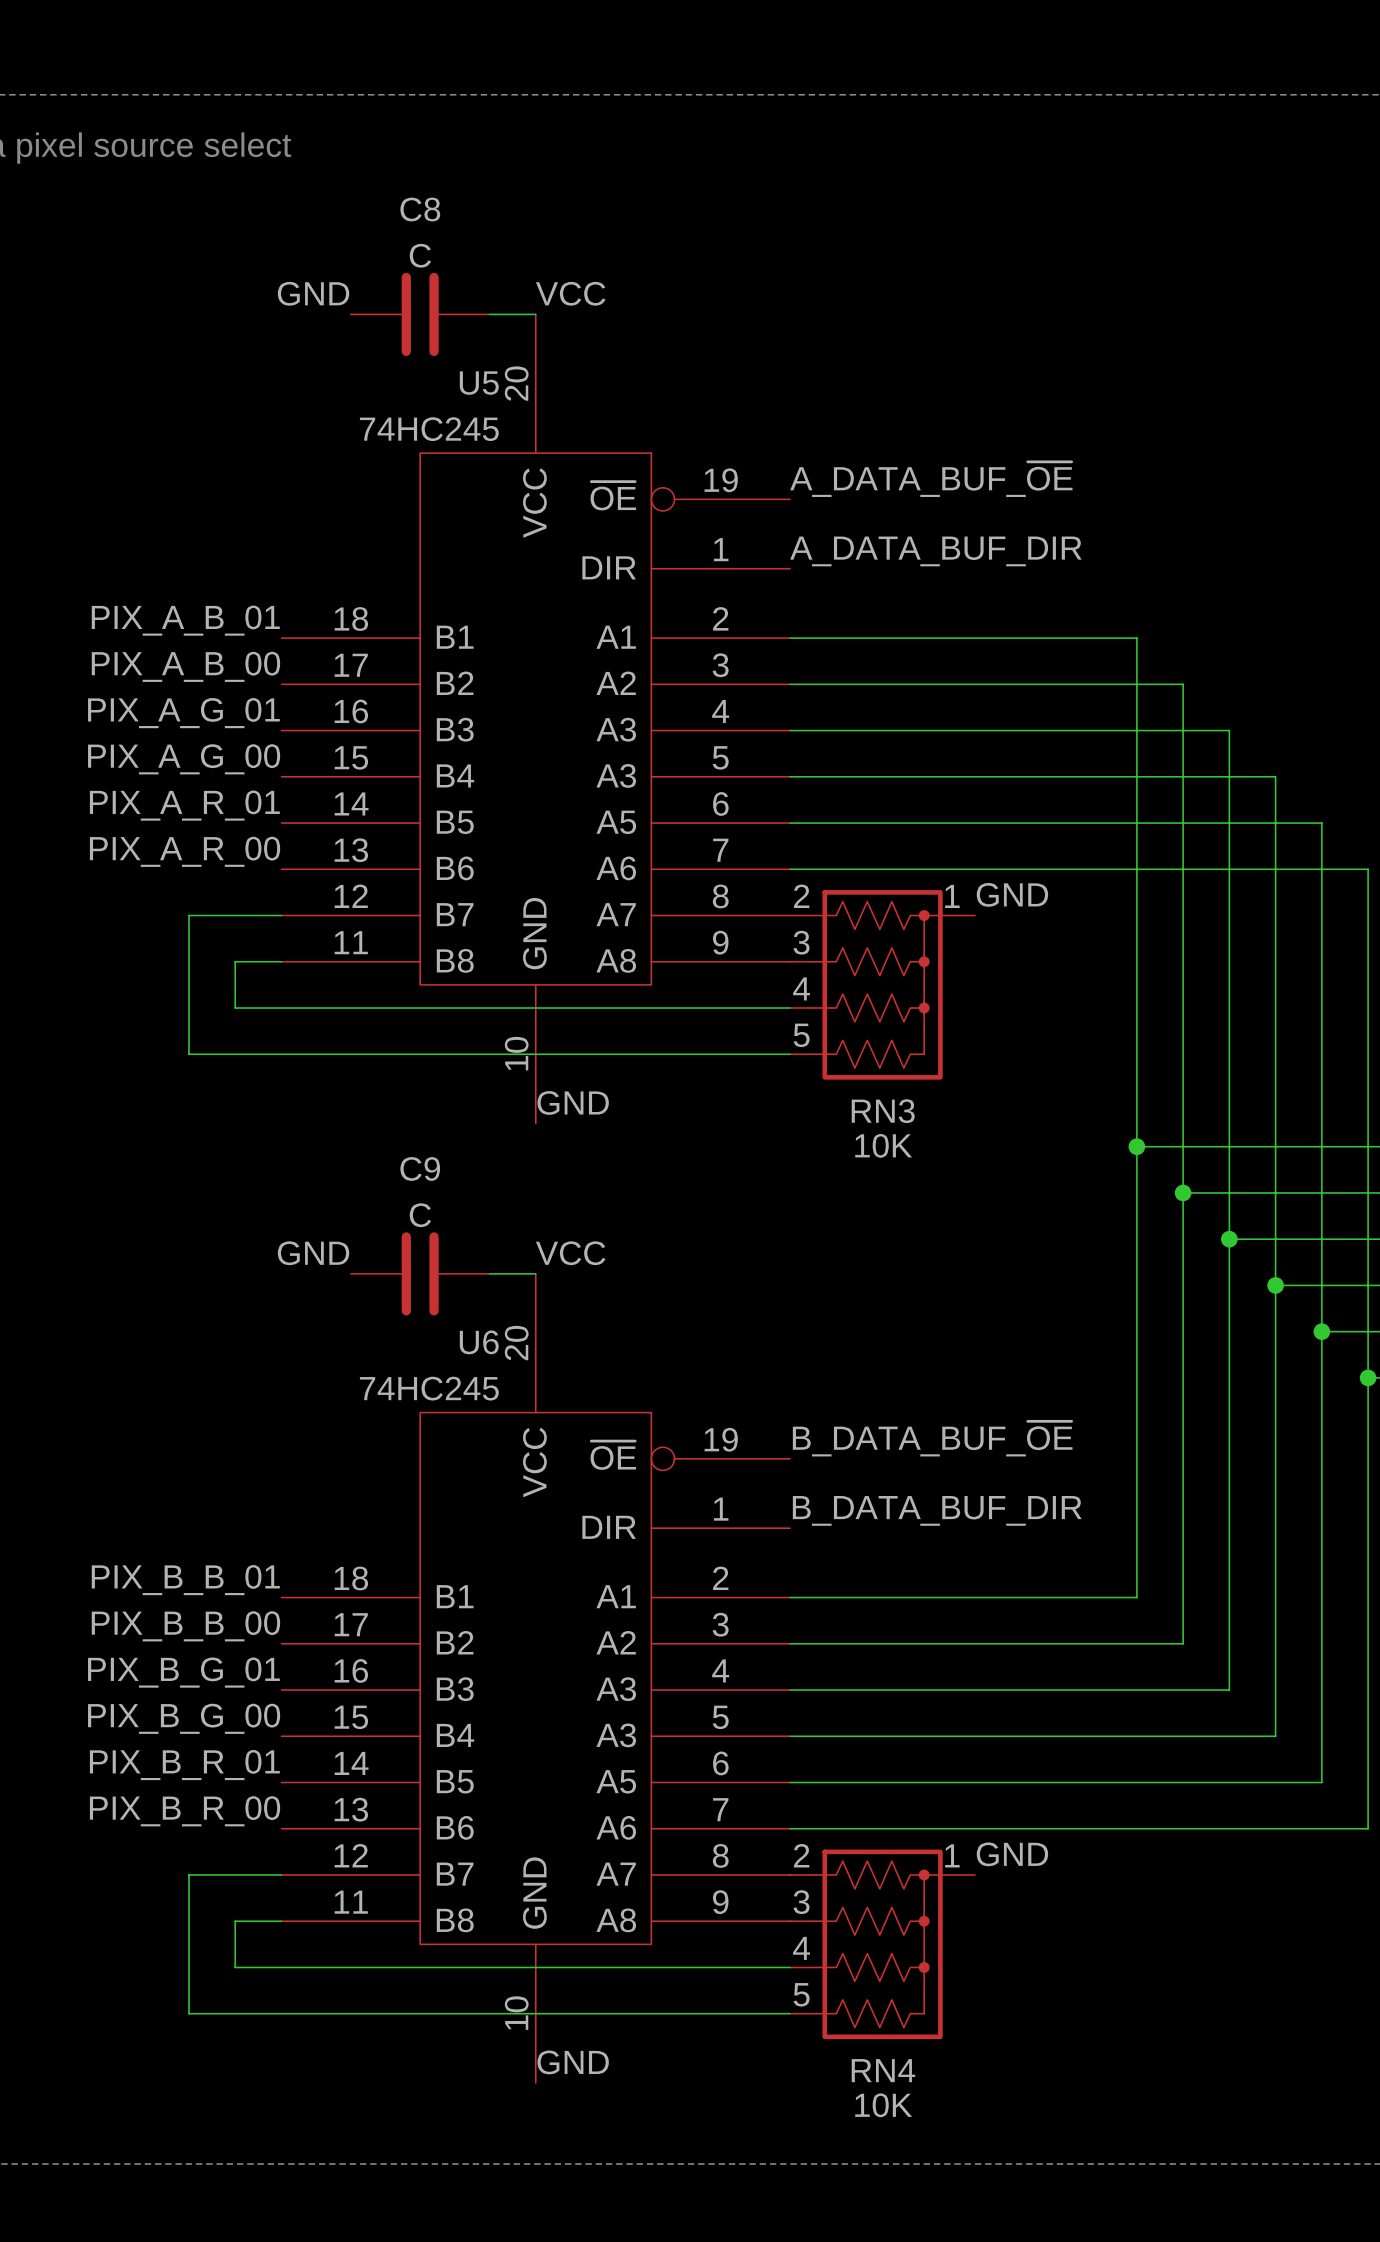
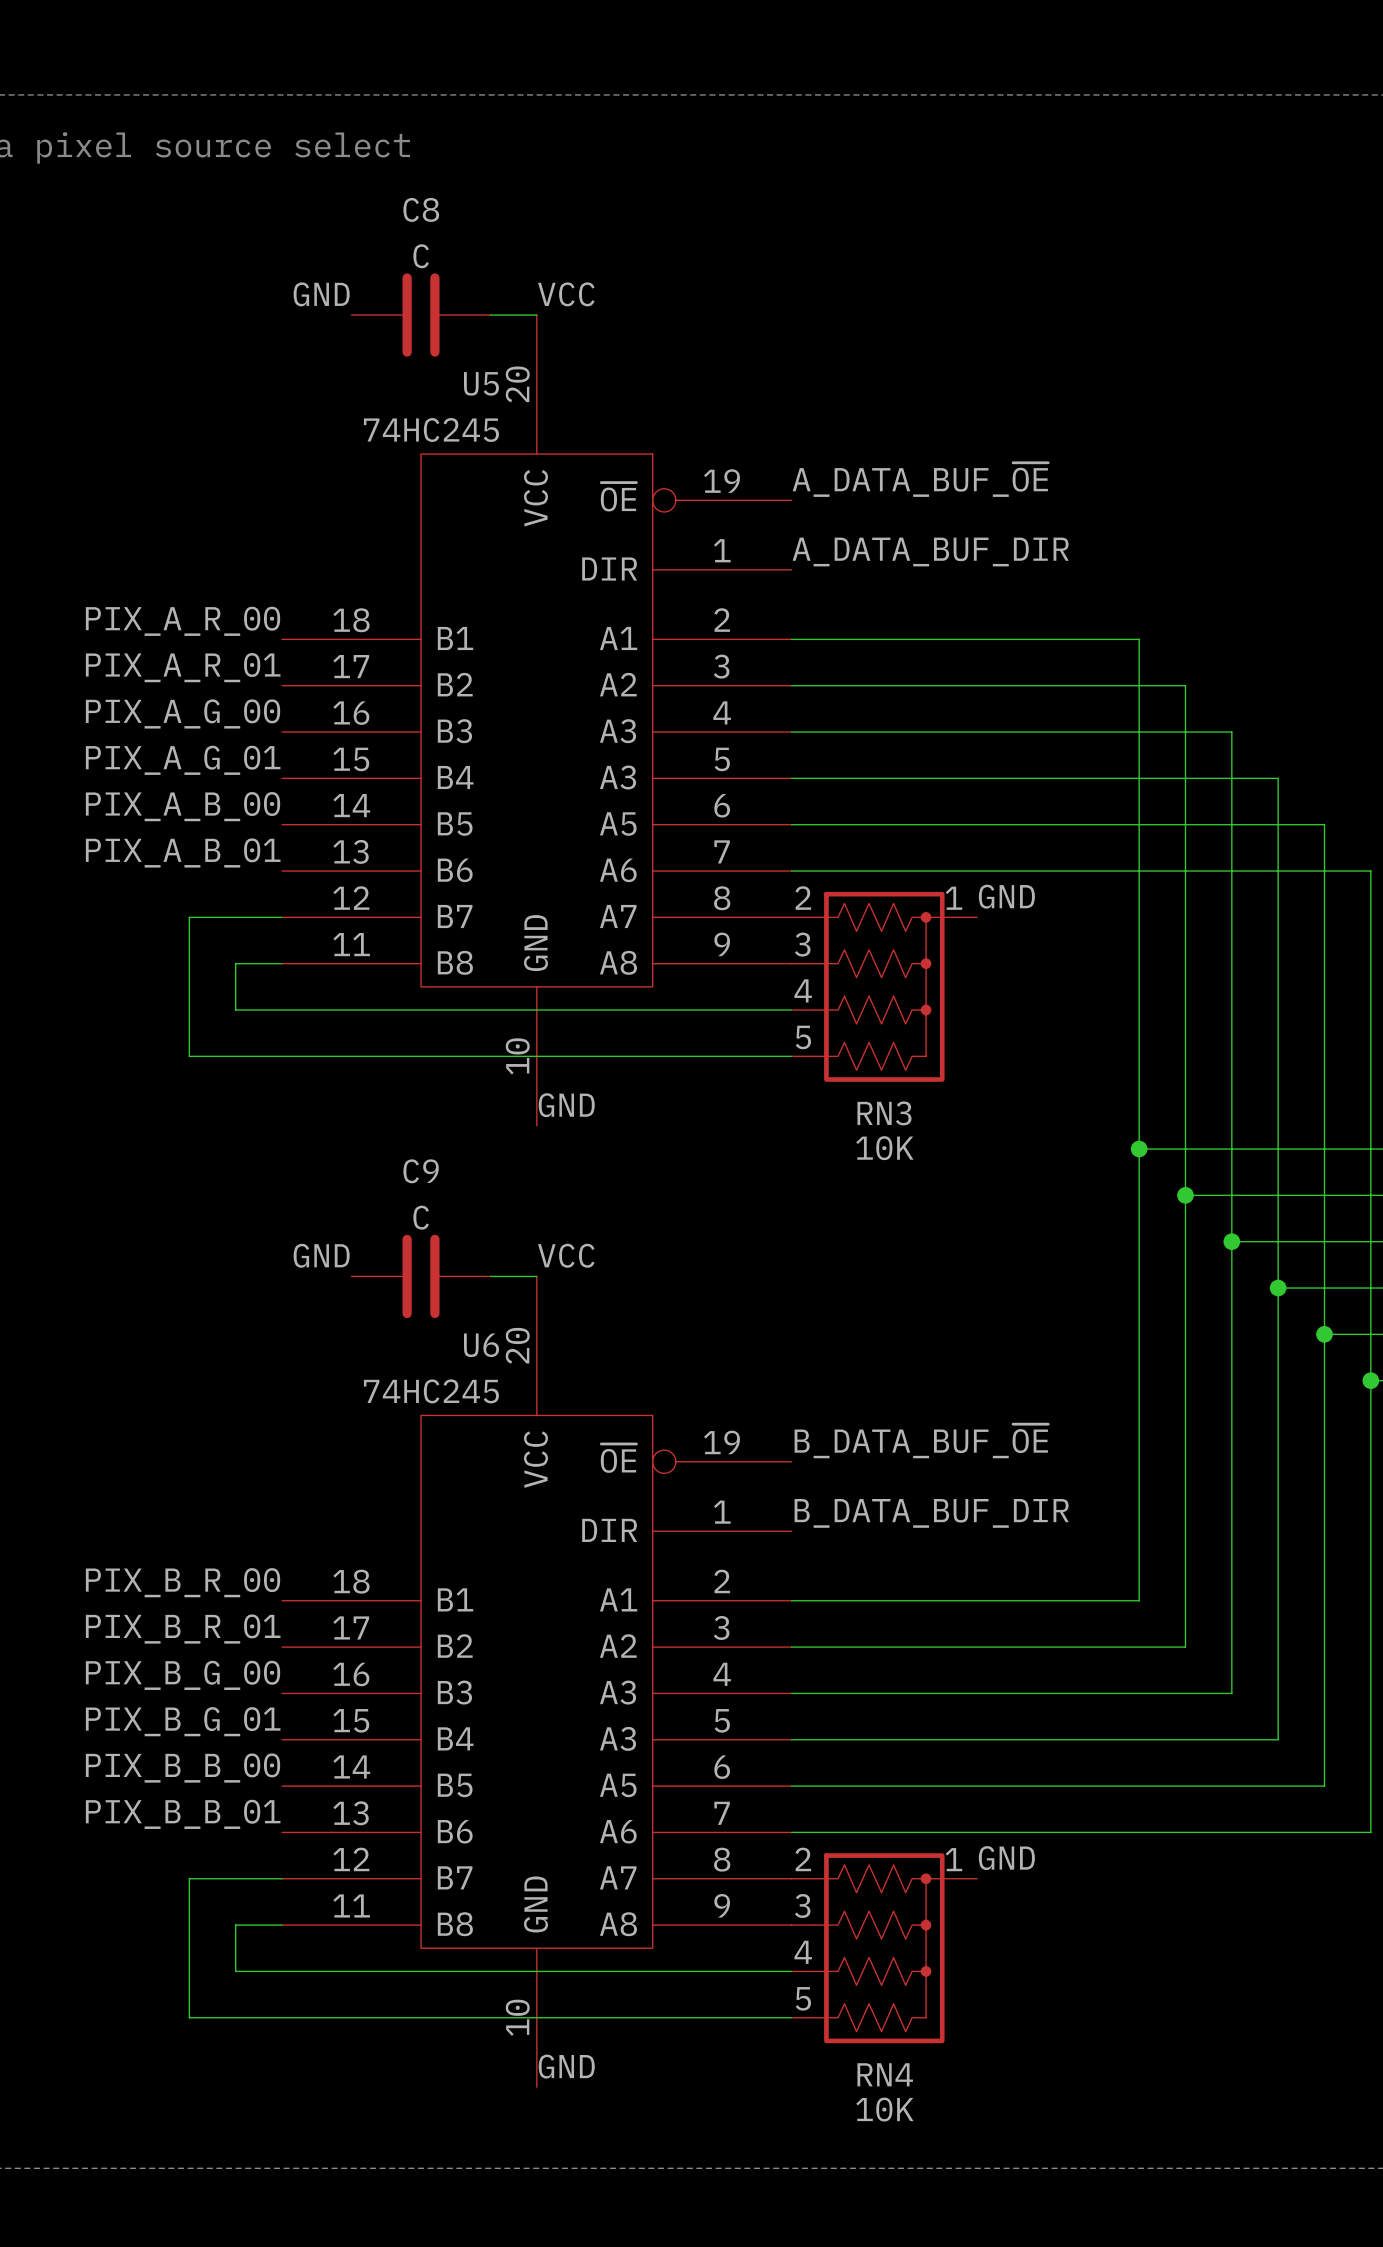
label: PIX_A_B_01 (185, 620) -> PIX_A_R_00 (183, 621)
label: PIX_A_B_00 (185, 666) -> PIX_A_R_01 (183, 667)
label: PIX_A_G_01 (183, 713) -> PIX_A_G_00 (183, 713)
label: PIX_A_G_00 (184, 759) -> PIX_A_G_01 (183, 760)
label: PIX_A_R_01 (184, 805) -> PIX_A_B_00 (183, 806)
label: PIX_A_R_00 (185, 851) -> PIX_A_B_01 (183, 852)
label: PIX_B_B_01 (185, 1580) -> PIX_B_R_00 (183, 1582)
label: PIX_B_B_00 (185, 1626) -> PIX_B_R_01 (183, 1629)
label: PIX_B_G_01 (183, 1672) -> PIX_B_G_00 (183, 1675)
label: PIX_B_G_00 (184, 1718) -> PIX_B_G_01 (183, 1721)
label: PIX_B_R_01 (184, 1765) -> PIX_B_B_00 (183, 1768)
label: PIX_B_R_00 (185, 1811) -> PIX_B_B_01 (183, 1814)

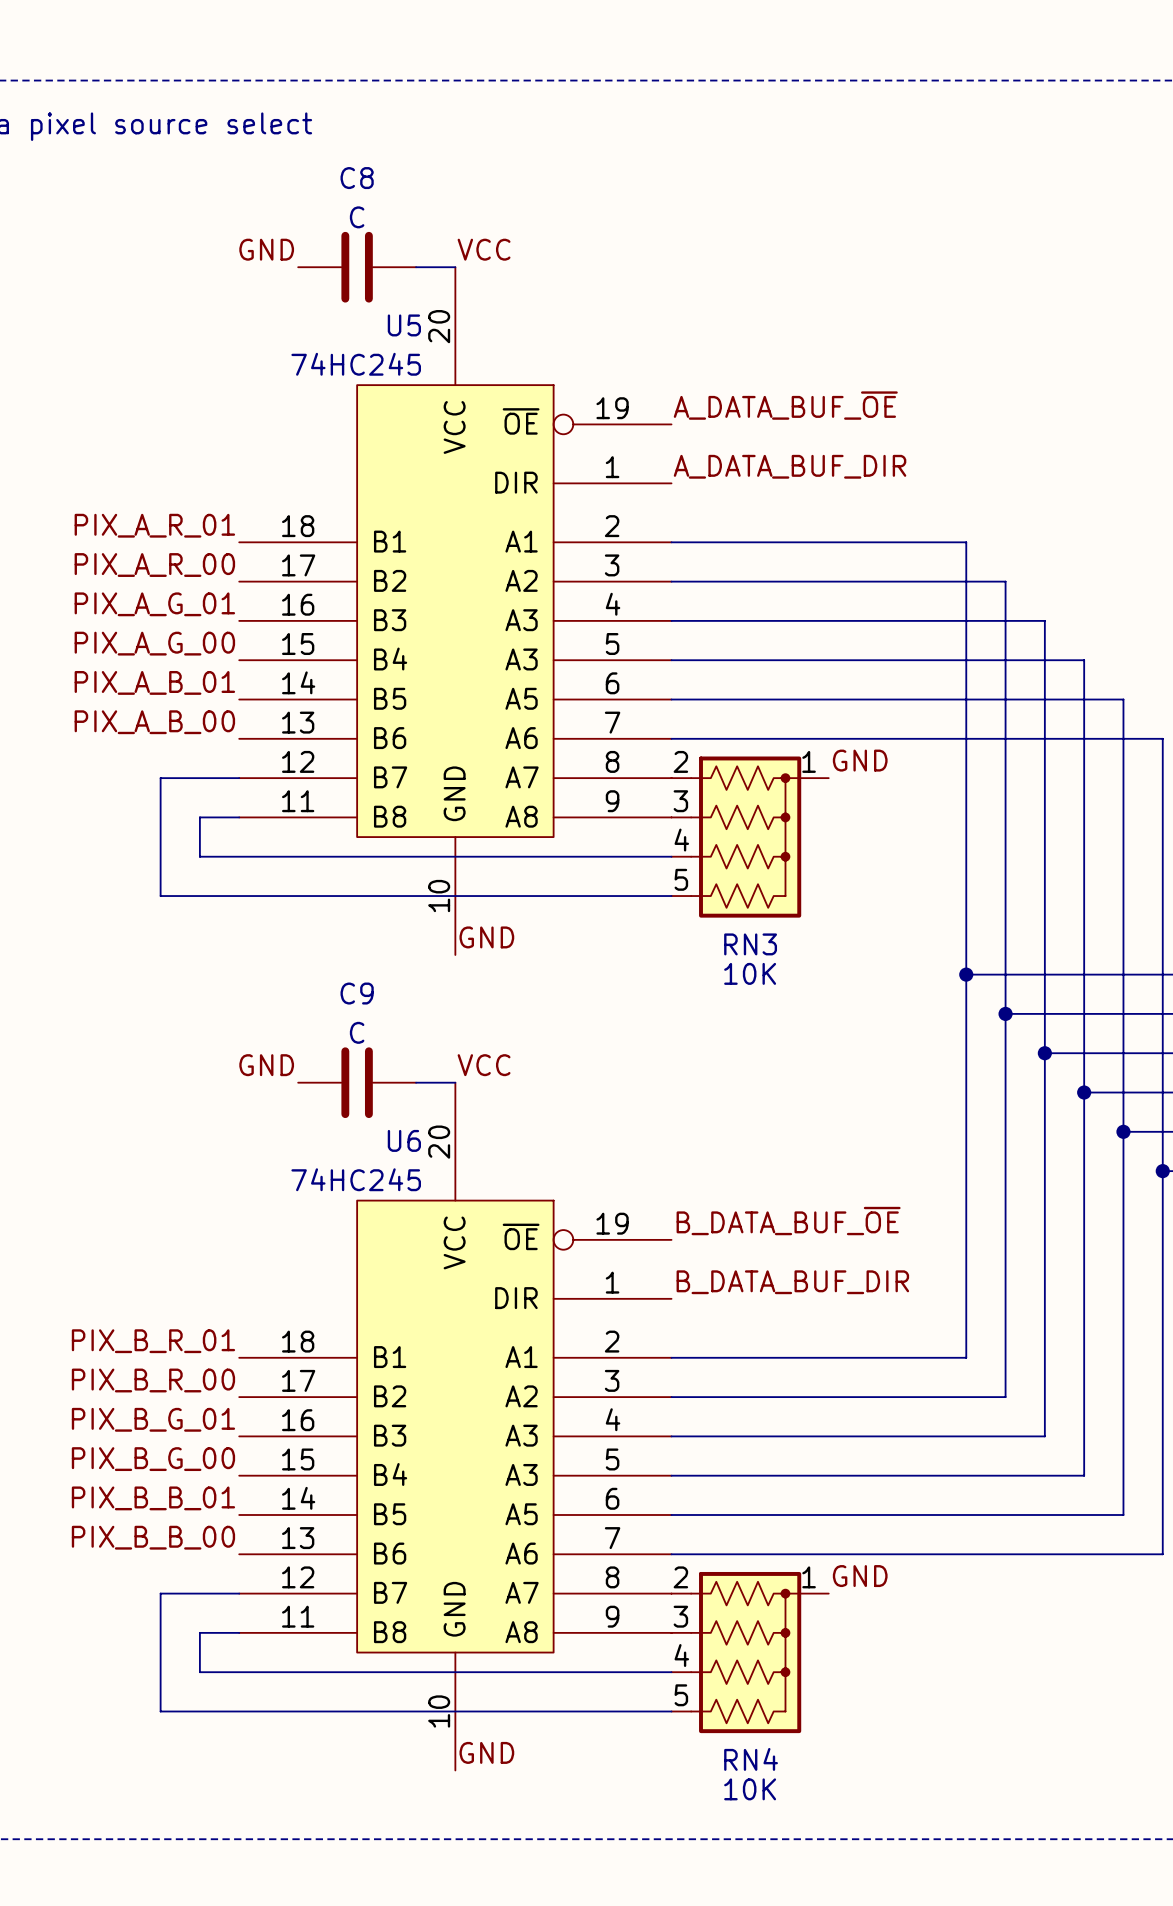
label: PIX_A_R_00 (183, 621) -> PIX_A_R_01 (154, 525)
label: PIX_A_R_01 (183, 667) -> PIX_A_R_00 (154, 565)
label: PIX_A_G_00 (183, 713) -> PIX_A_G_01 (154, 604)
label: PIX_A_G_01 (183, 760) -> PIX_A_G_00 (154, 643)
label: PIX_A_B_00 (183, 806) -> PIX_A_B_01 (154, 682)
label: PIX_A_B_01 (183, 852) -> PIX_A_B_00 (154, 722)
label: PIX_B_R_00 (183, 1582) -> PIX_B_R_01 (153, 1341)
label: PIX_B_R_01 (183, 1629) -> PIX_B_R_00 (153, 1380)
label: PIX_B_G_00 (183, 1675) -> PIX_B_G_01 (153, 1419)
label: PIX_B_G_01 (183, 1721) -> PIX_B_G_00 (153, 1459)
label: PIX_B_B_00 (183, 1768) -> PIX_B_B_01 (153, 1498)
label: PIX_B_B_01 (183, 1814) -> PIX_B_B_00 (153, 1537)

